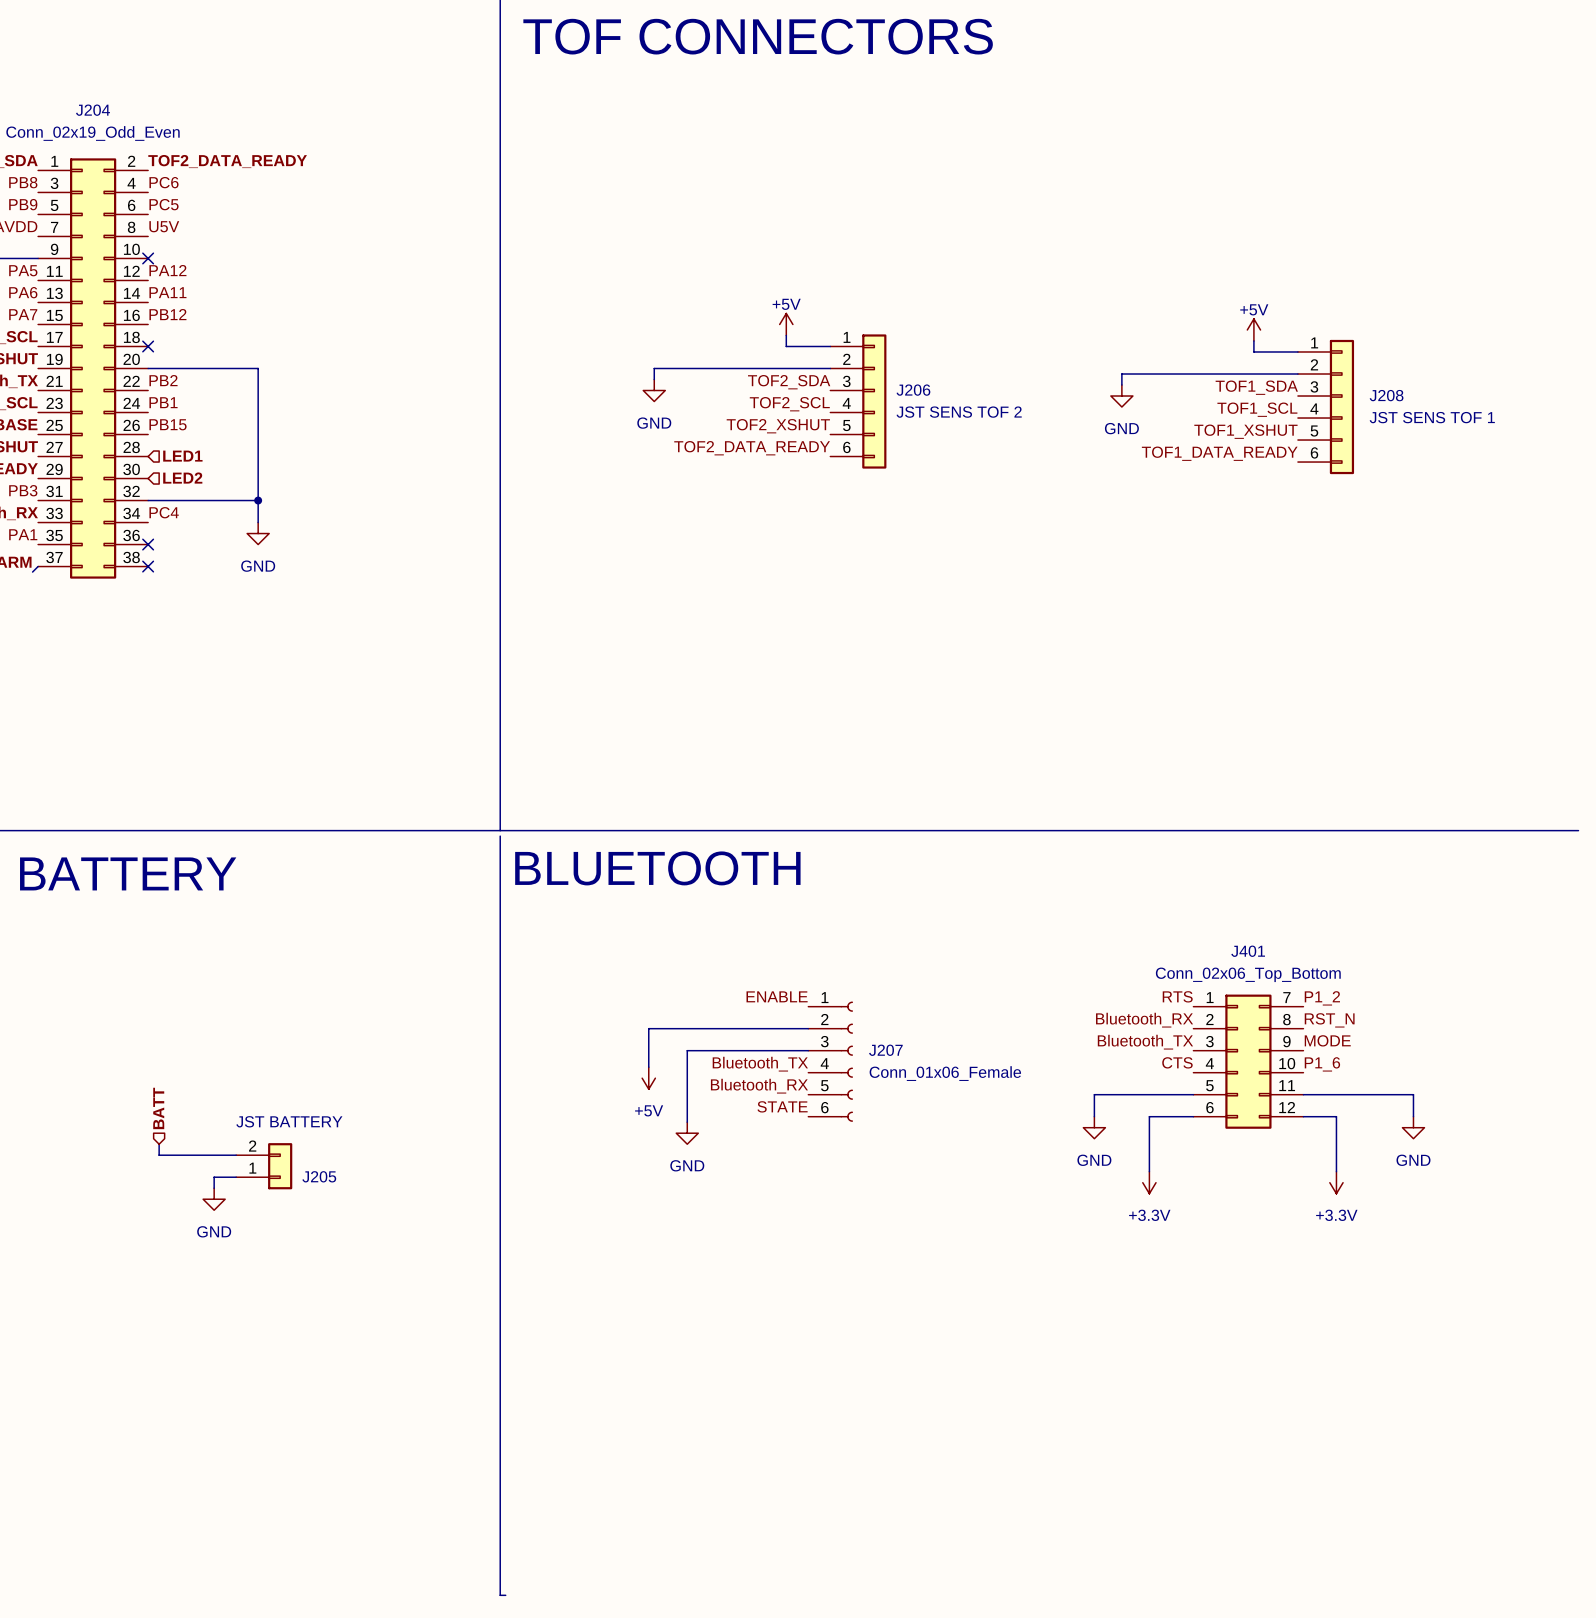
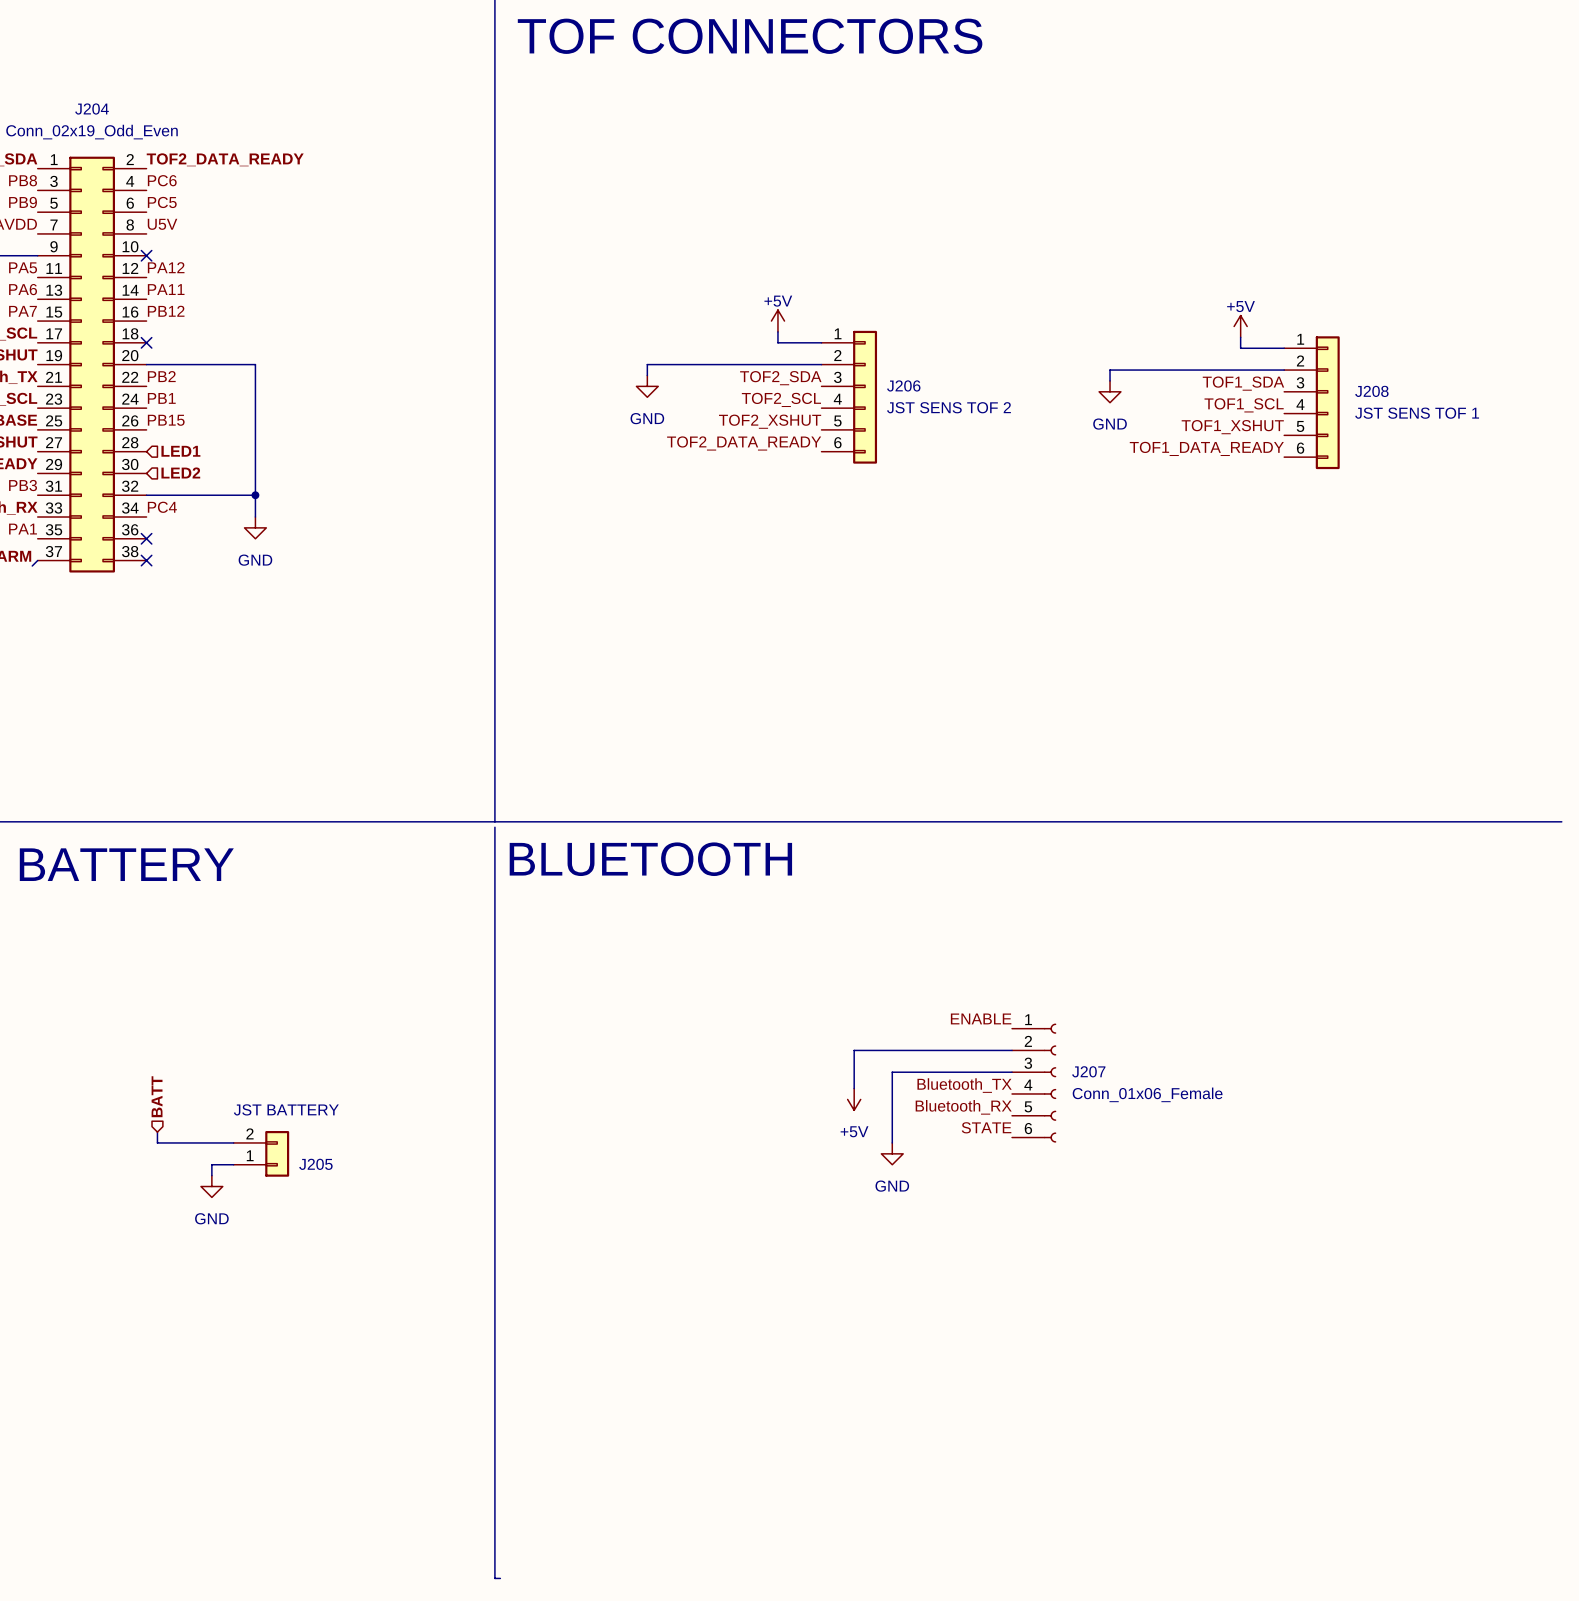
label: ENABLE (777, 996) -> none
label: RTS (1177, 996) -> none
label: P1_2 (1322, 998) -> none
label: Bluetooth_RX (1144, 1020) -> none
label: RST_N (1329, 1020) -> none
wire: (808, 1028) (648, 1028) (648, 1067) -> none
label: none -> ENABLE (981, 1018)
label: MODE (1327, 1040) -> none
label: Bluetooth_TX (1145, 1042) -> none
wire: (808, 1050) (687, 1050) (687, 1122) -> none
J207 position: (830, 1061) -> (1034, 1083)
wire: none -> (1012, 1050) (854, 1050) (854, 1088)
J401: Conn_02x06_Top_Bottom (1248, 1061) -> none
label: CTS (1177, 1062) -> none
label: Bluetooth_TX (760, 1064) -> none
label: P1_6 (1322, 1064) -> none
power symbol: +5V (648, 1078) -> none
wire: none -> (1012, 1072) (892, 1072) (892, 1142)
label: Bluetooth_RX (759, 1086) -> none
wire: (1193, 1094) (1094, 1094) (1094, 1116) -> none
wire: (1303, 1094) (1413, 1094) (1413, 1116) -> none
label: none -> Bluetooth_TX (964, 1085)
label: STATE (782, 1106) -> none
power symbol: none -> +5V (854, 1099)
wire: (1193, 1116) (1149, 1116) (1149, 1171) -> none
wire: (1303, 1116) (1336, 1116) (1336, 1171) -> none
label: none -> Bluetooth_RX (963, 1107)
power symbol: GND (1094, 1127) -> none
power symbol: GND (1413, 1127) -> none
power symbol: GND (687, 1133) -> none
label: none -> STATE (986, 1127)
power symbol: none -> GND (892, 1153)
power symbol: +3.3V (1149, 1182) -> none
power symbol: +3.3V (1336, 1182) -> none

